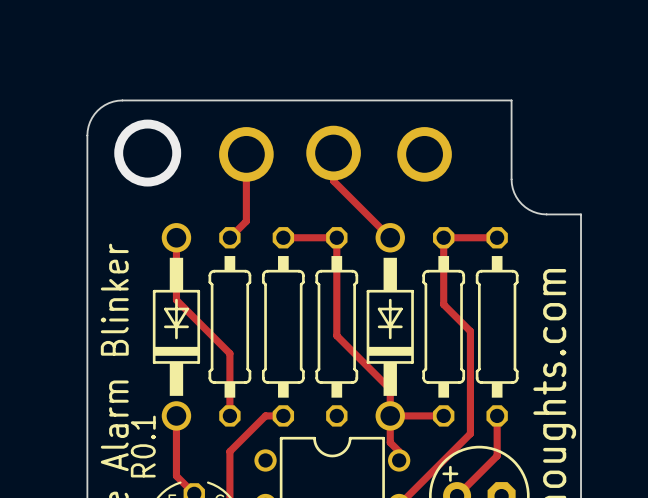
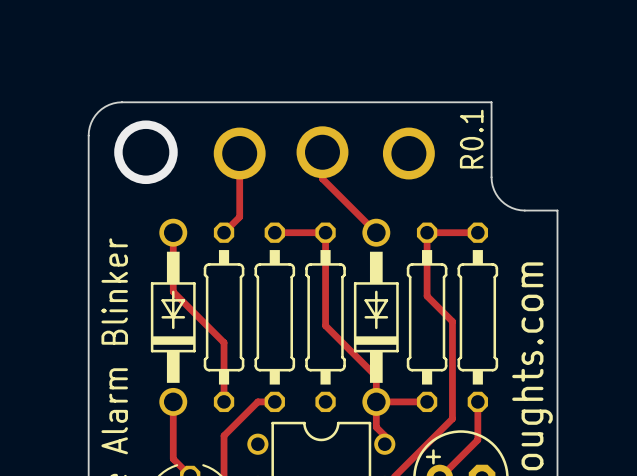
text: none -> R0.1 (471, 139)
text: R0.1 (143, 446) -> none

